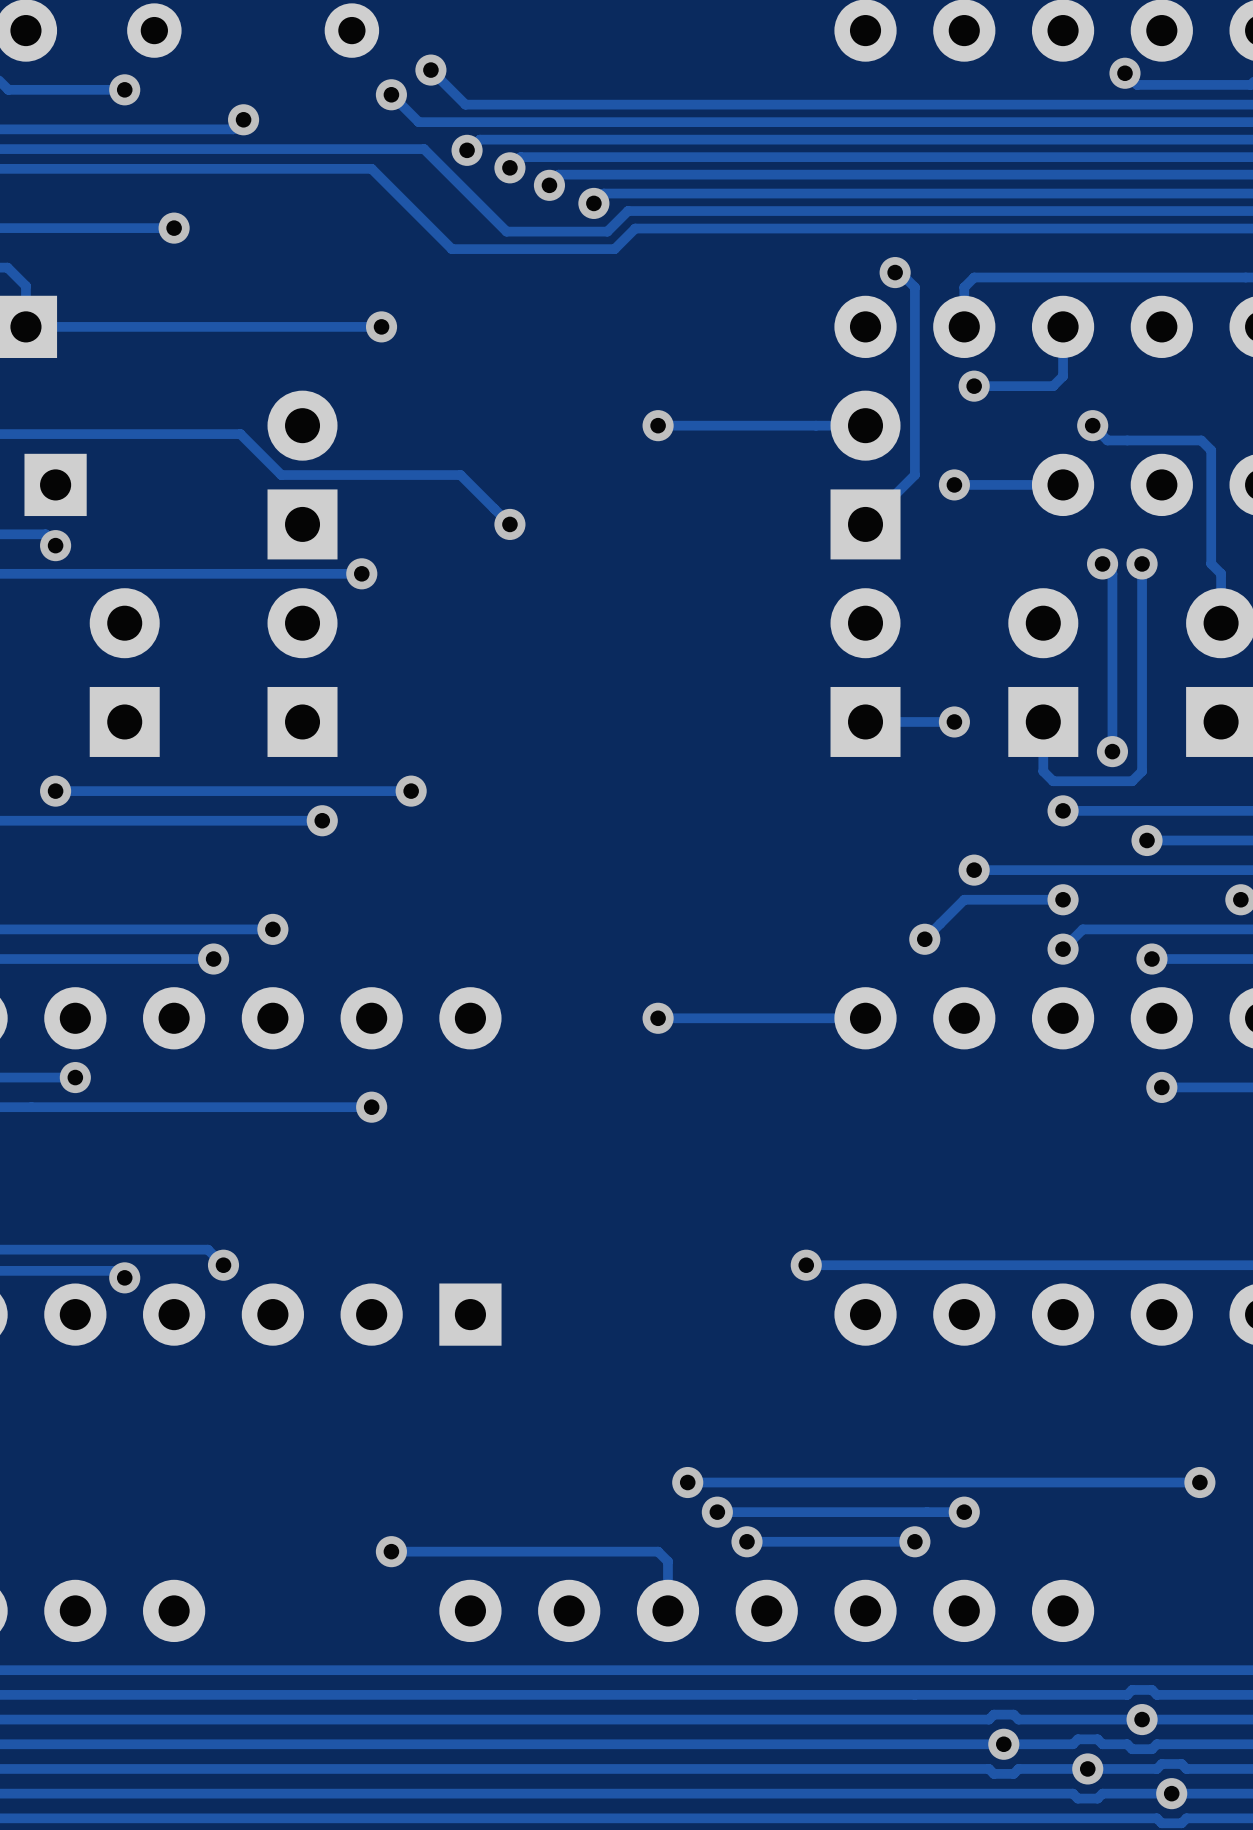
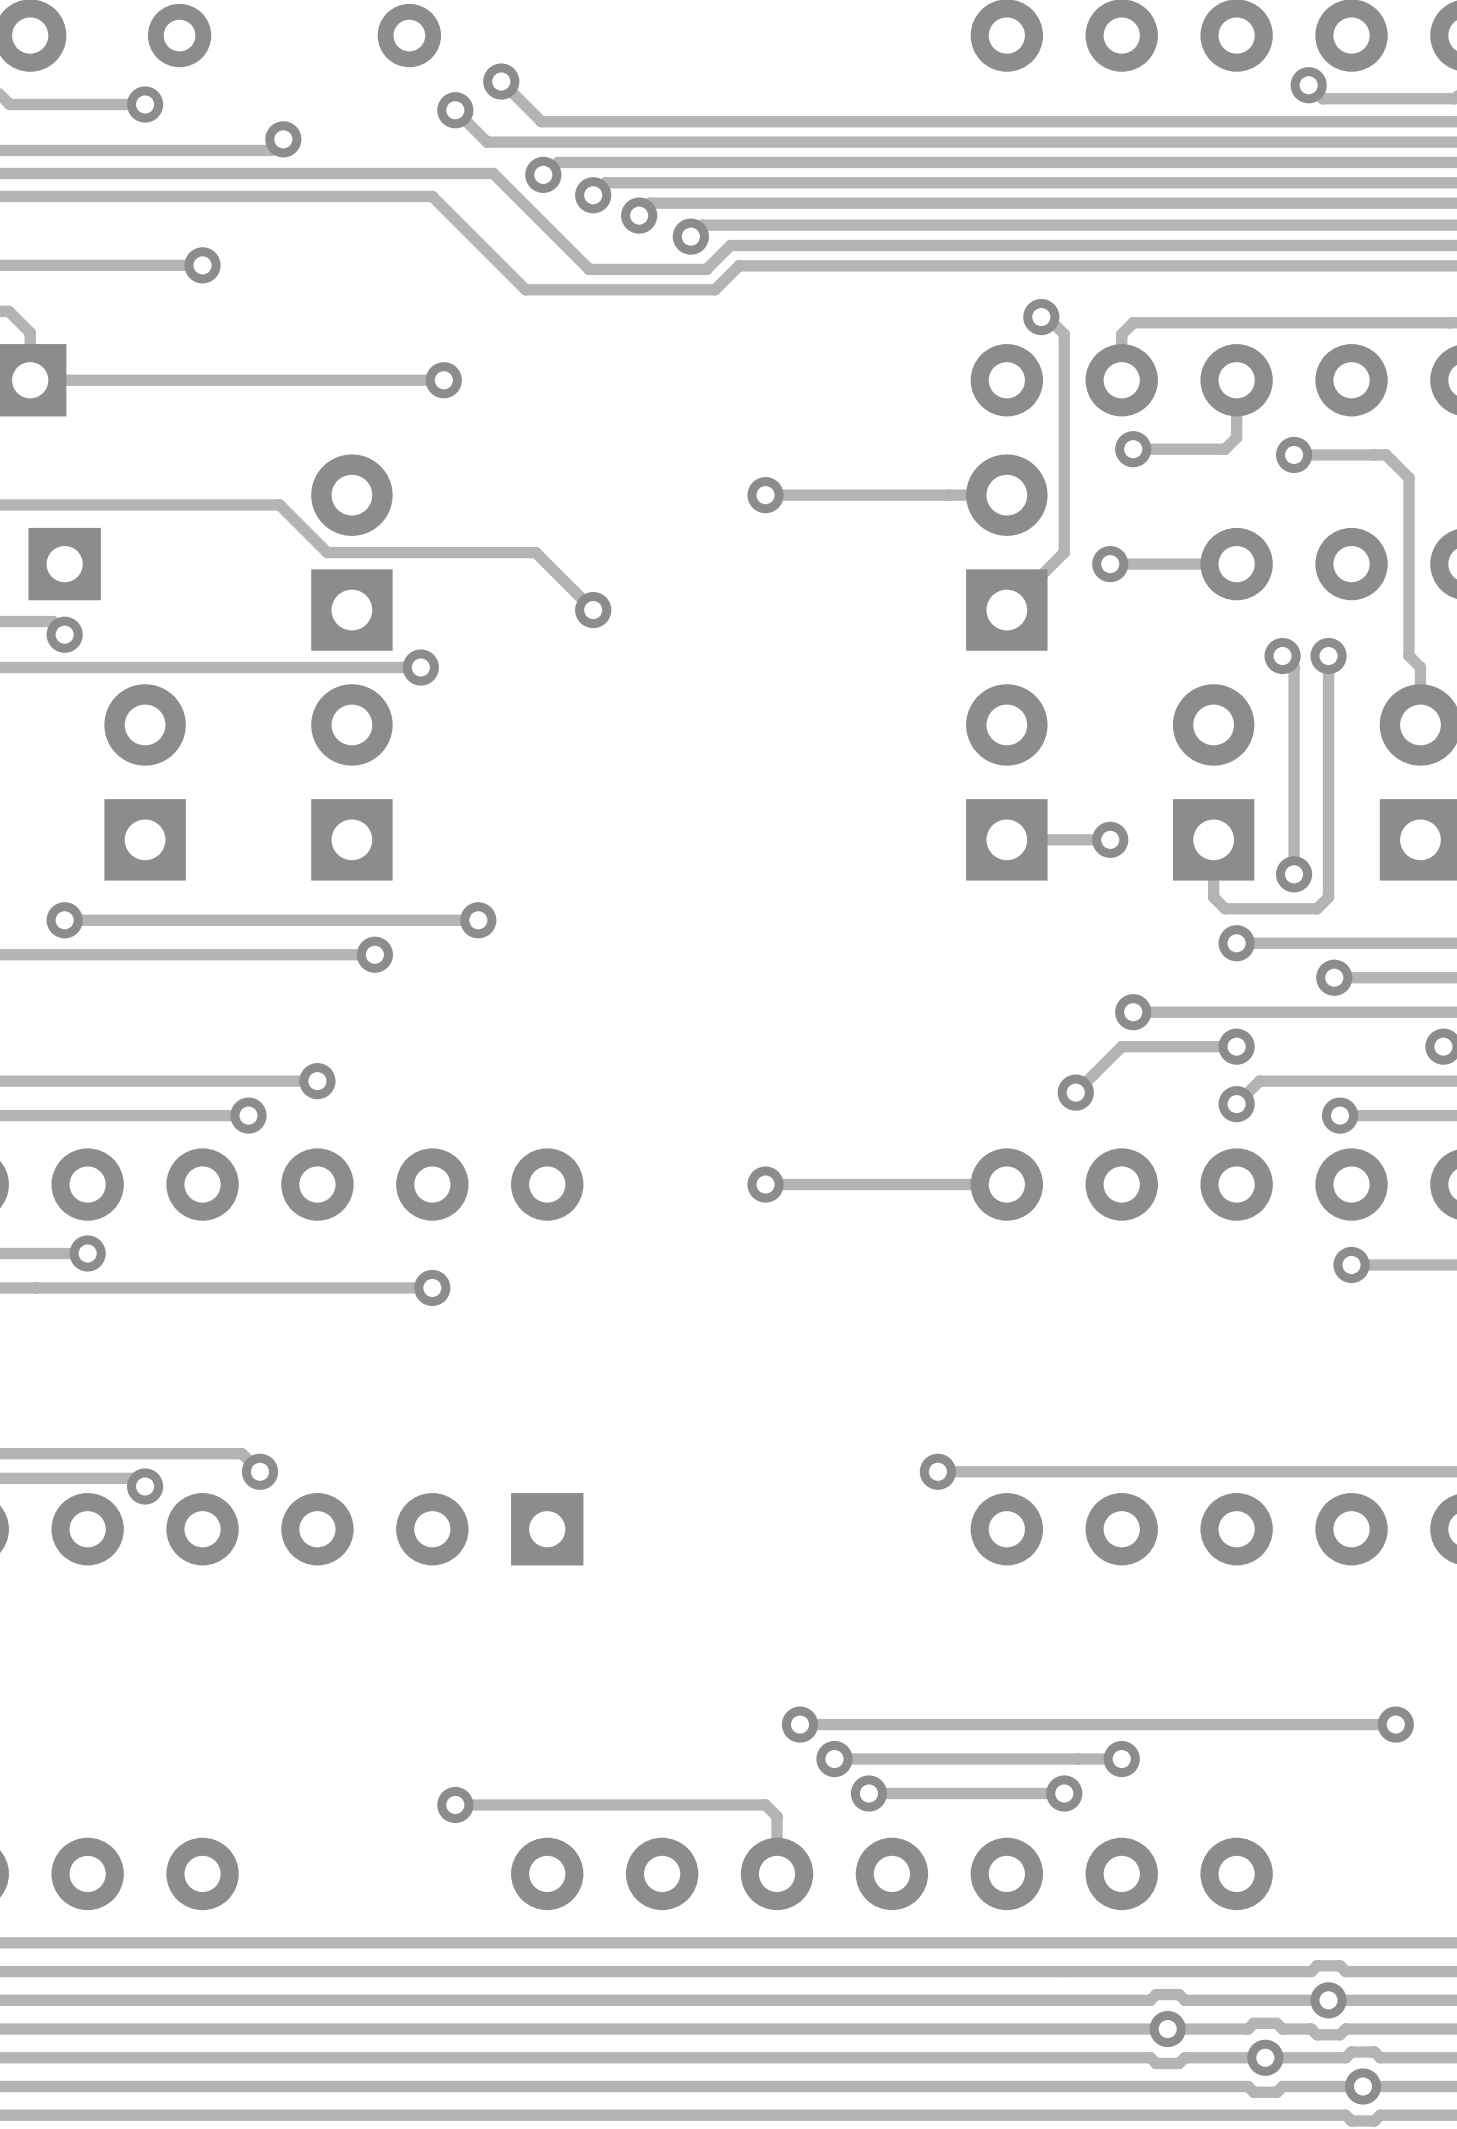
track: (1092, 425) (1107, 440) (1201, 440) (1211, 450) -> (1294, 454) (1385, 454) (1408, 477) (1408, 523)
via position: (1092, 425) -> (1294, 454)

